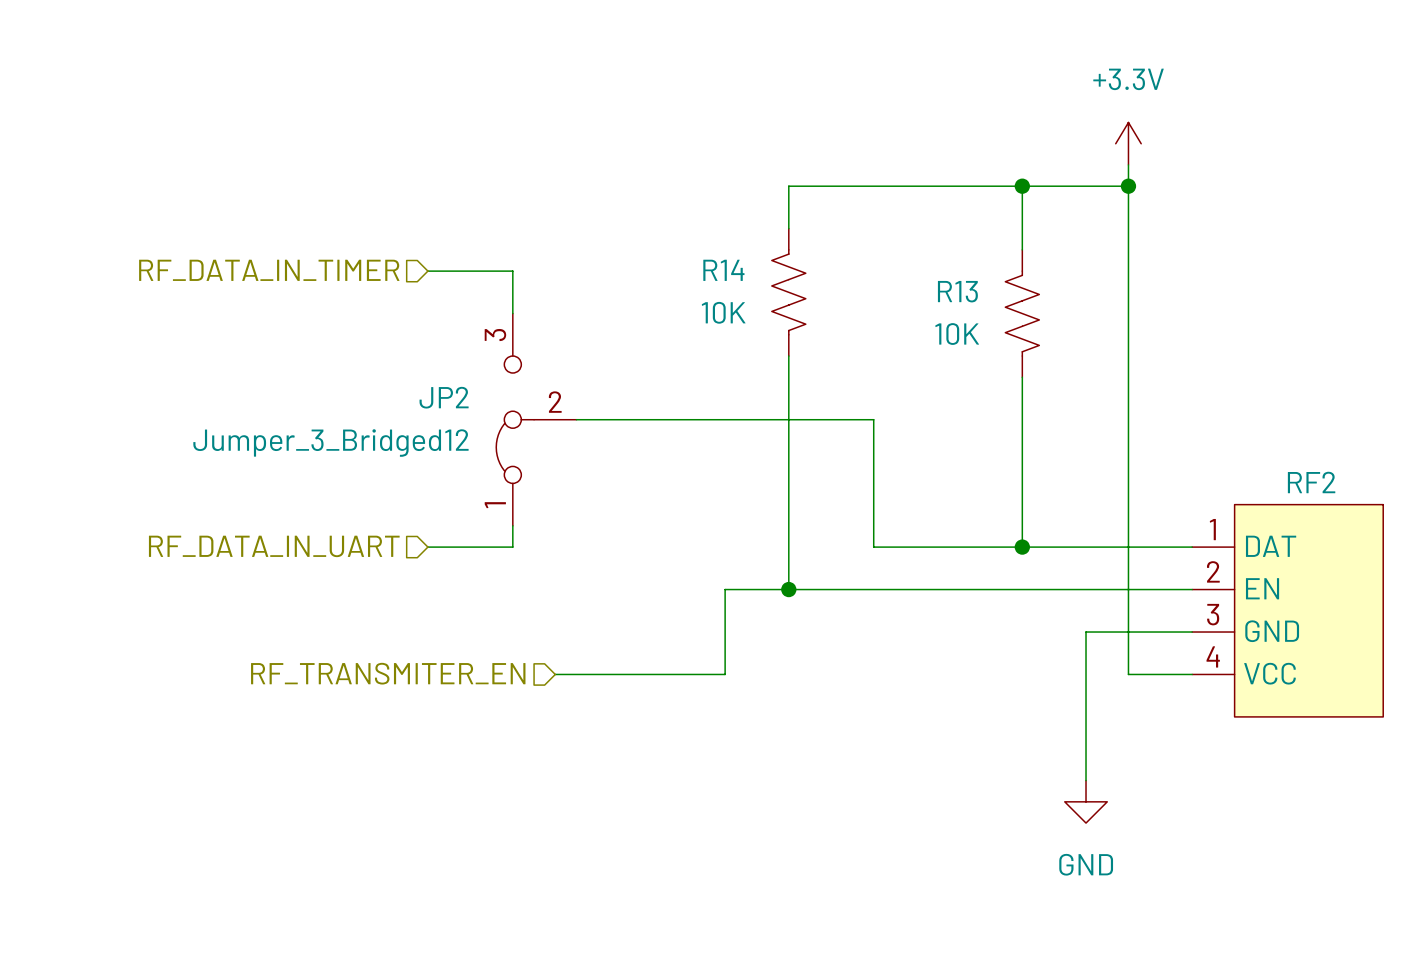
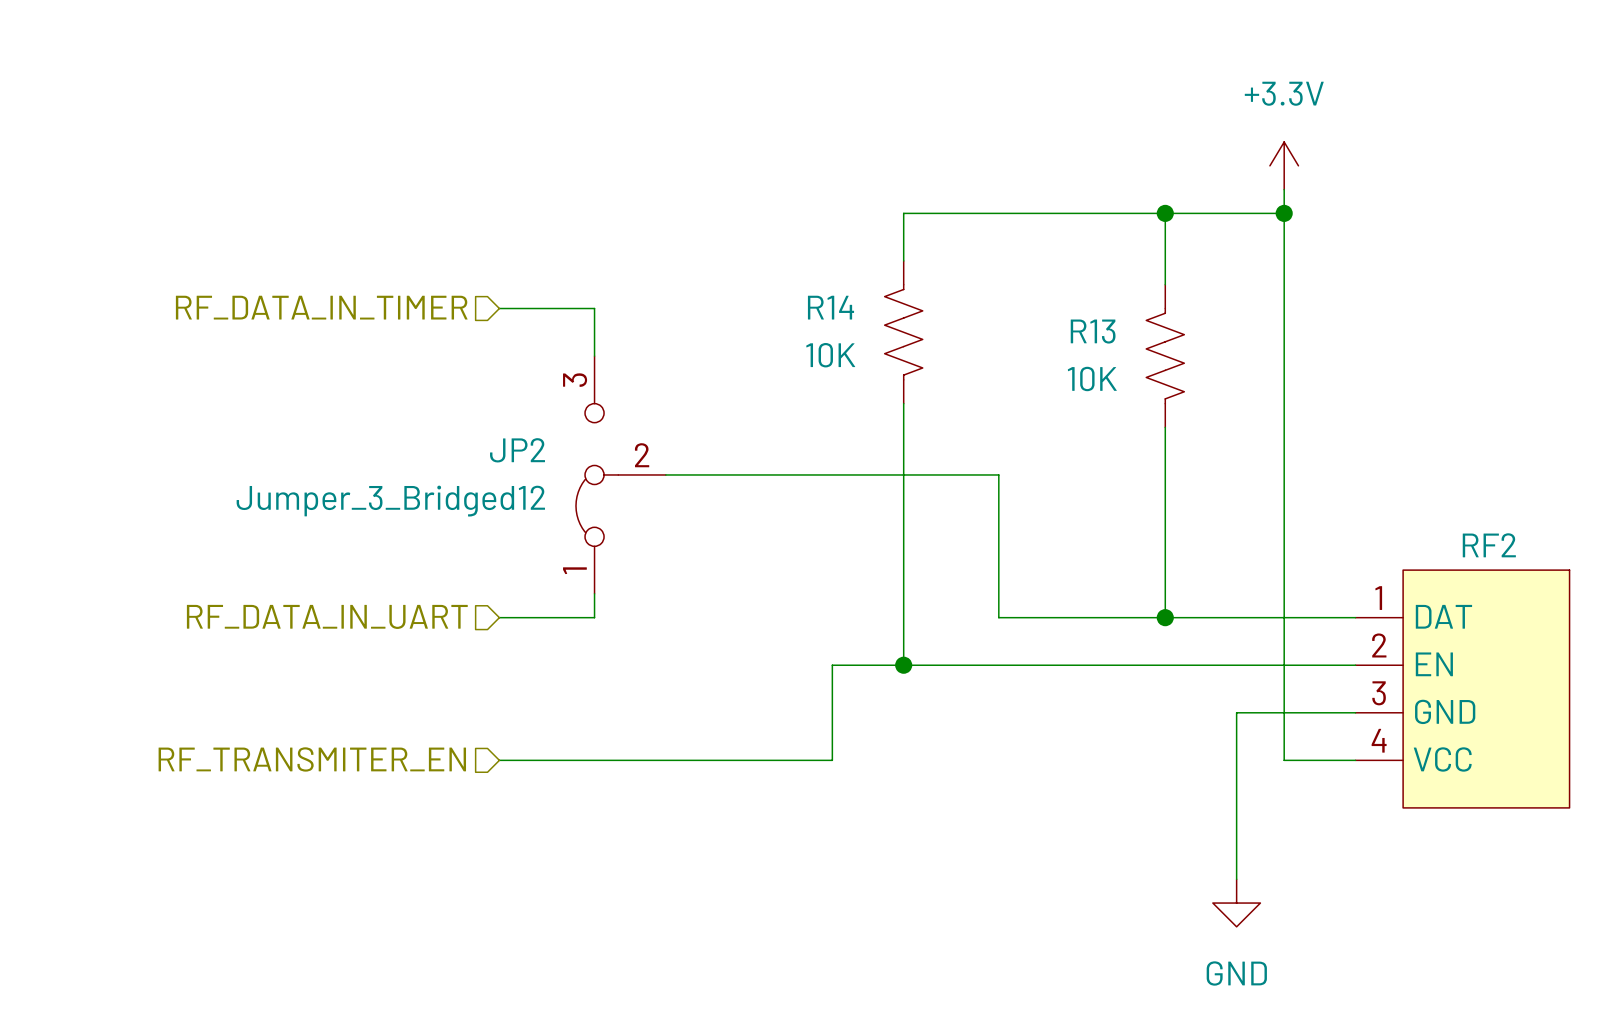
hierarchical label position: RF_TRANSMITER_EN (388, 673) -> RF_TRANSMITER_EN (312, 759)
wire: none -> (499, 760) (642, 760)

